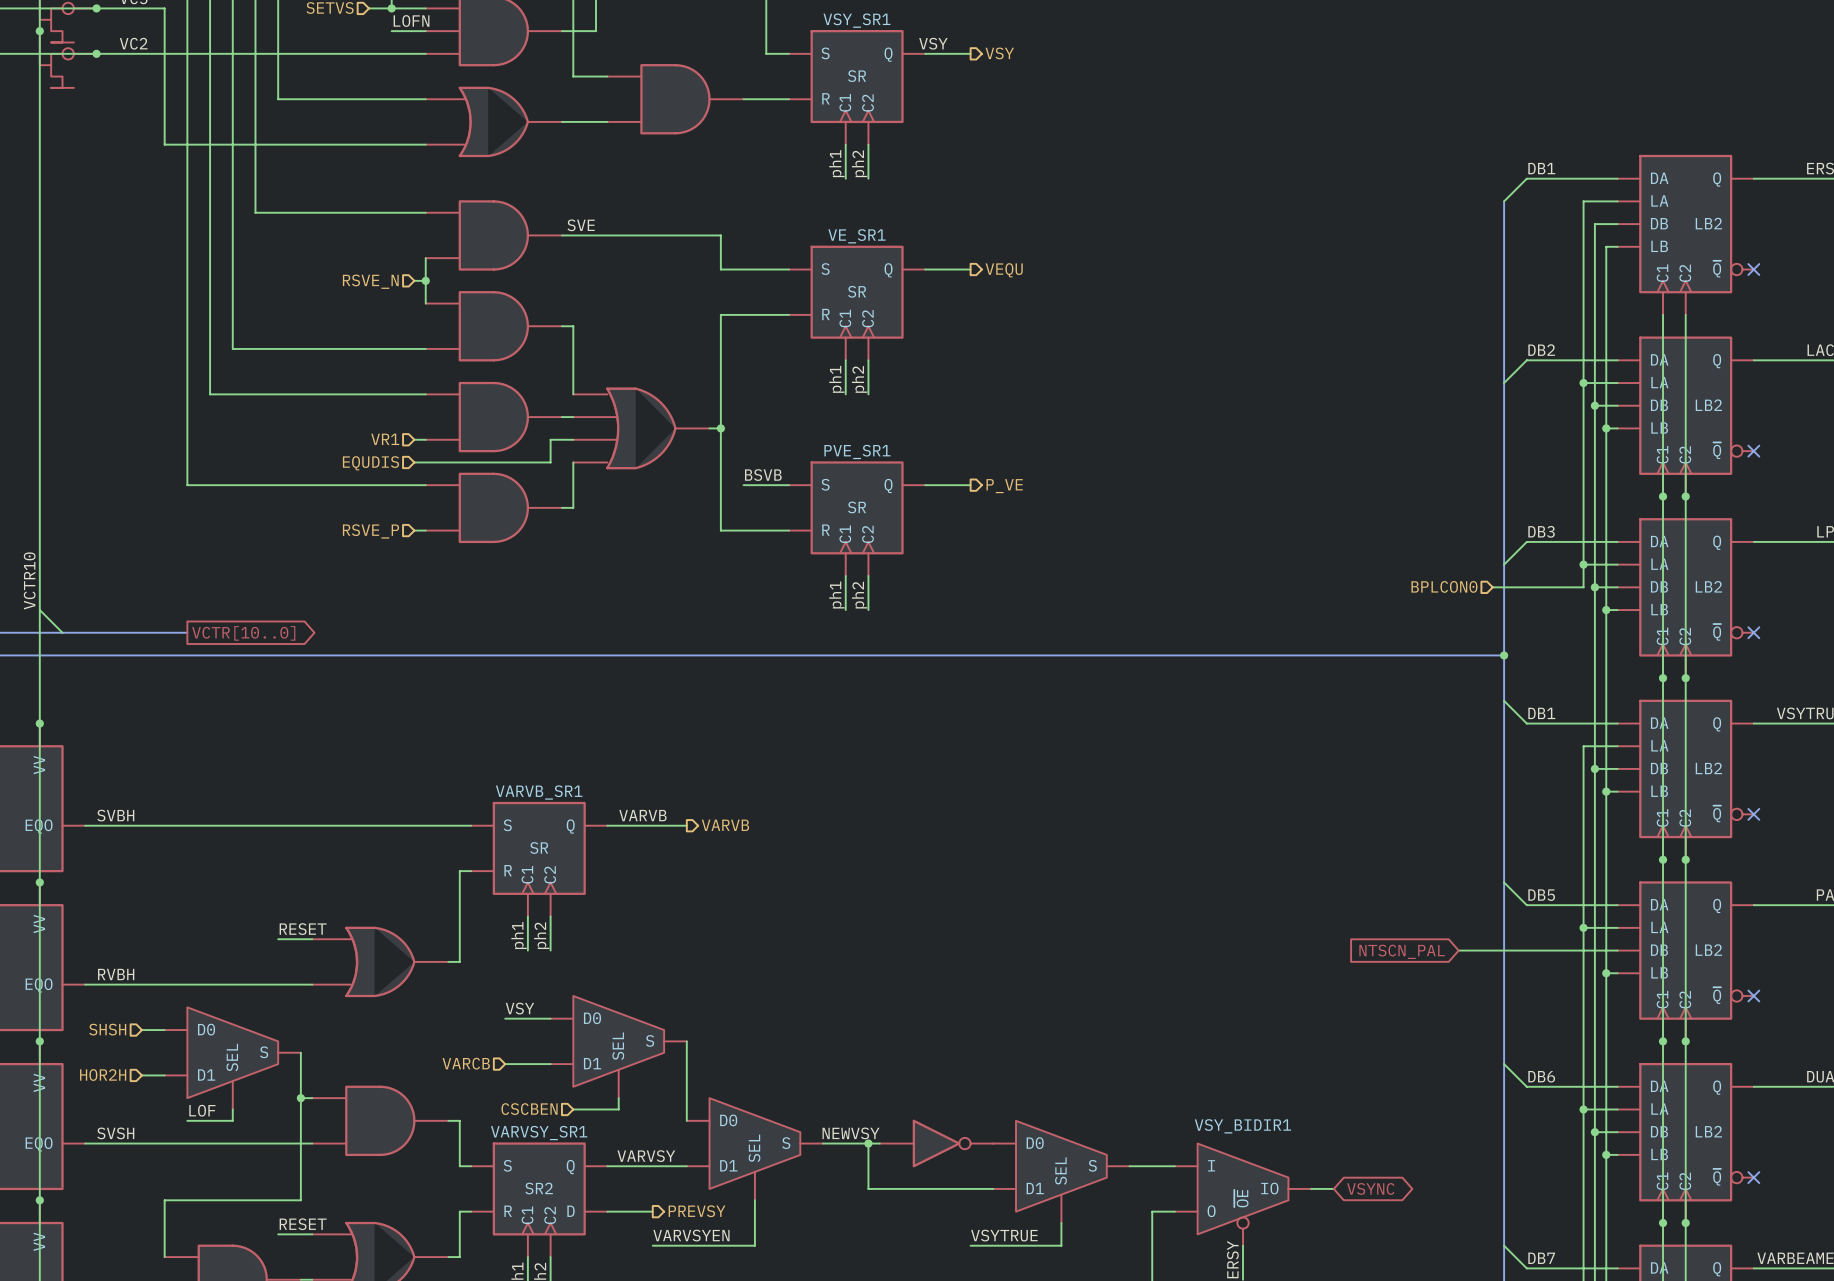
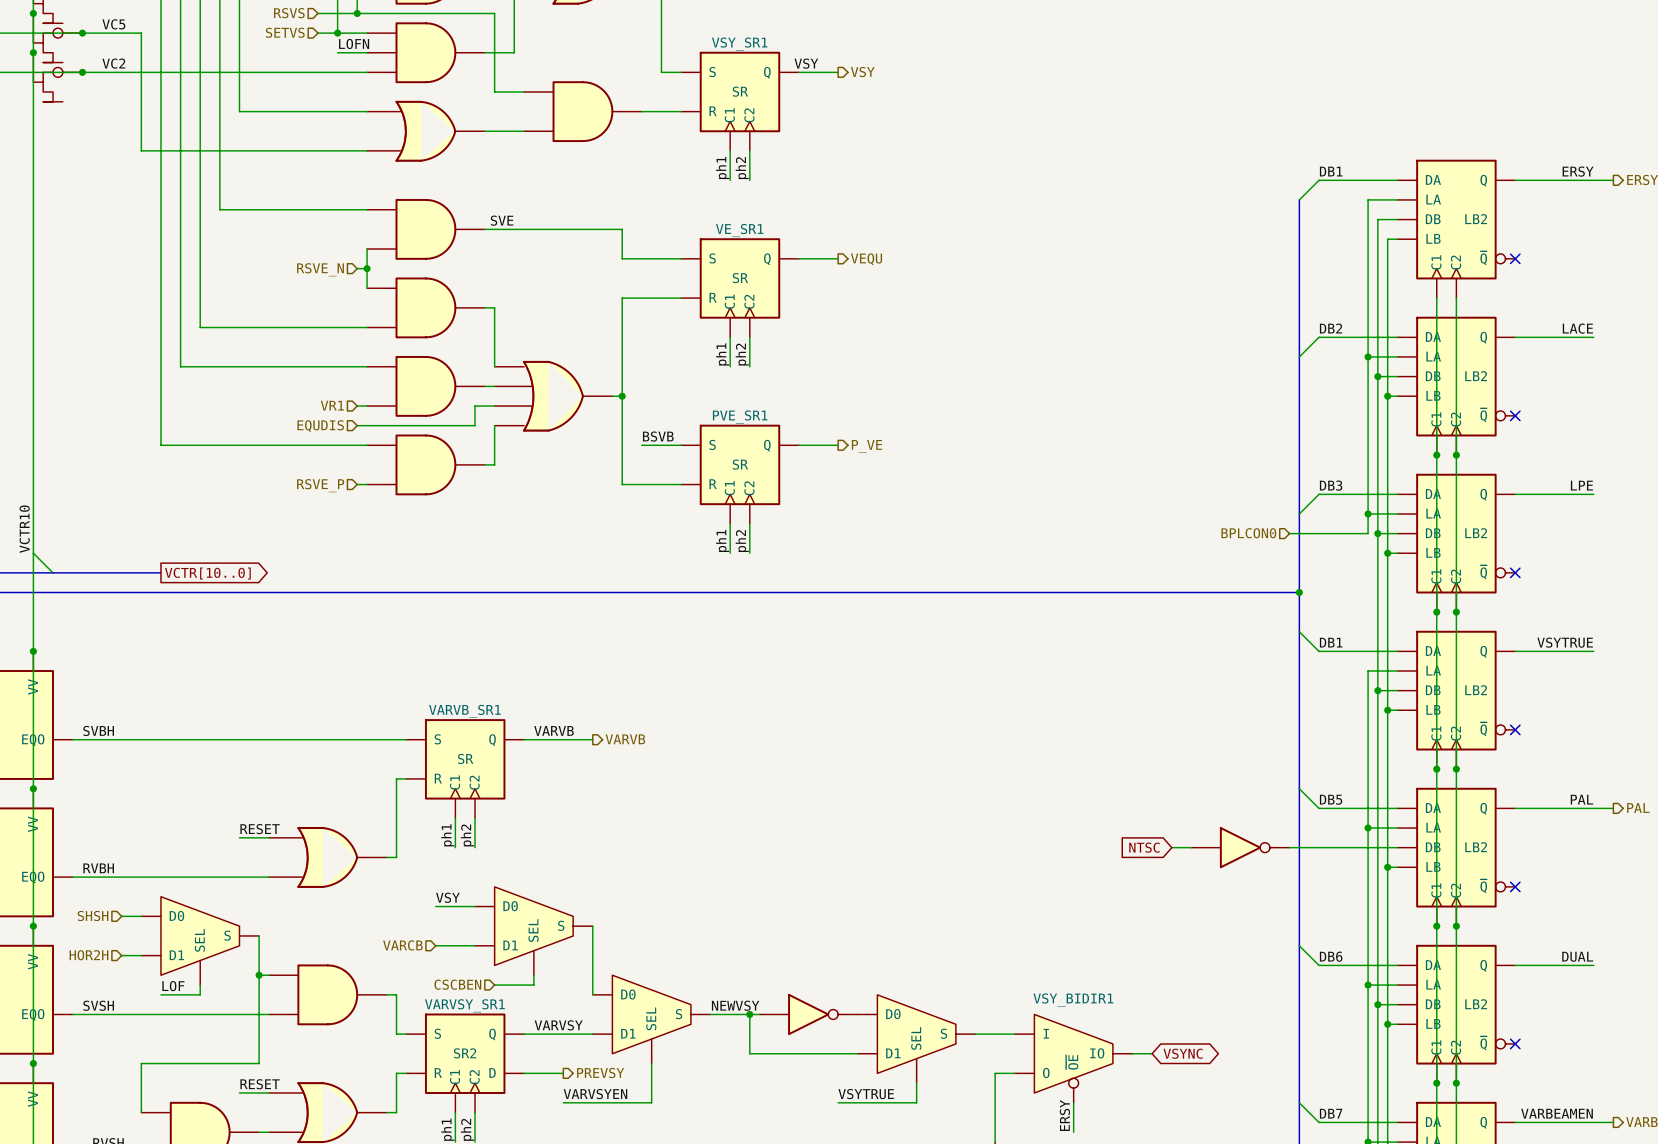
wire: none -> (1171, 847) (1191, 847)
part: none -> (1240, 847)
global label: NTSCN_PAL (1402, 951) -> NTSC (1144, 847)

